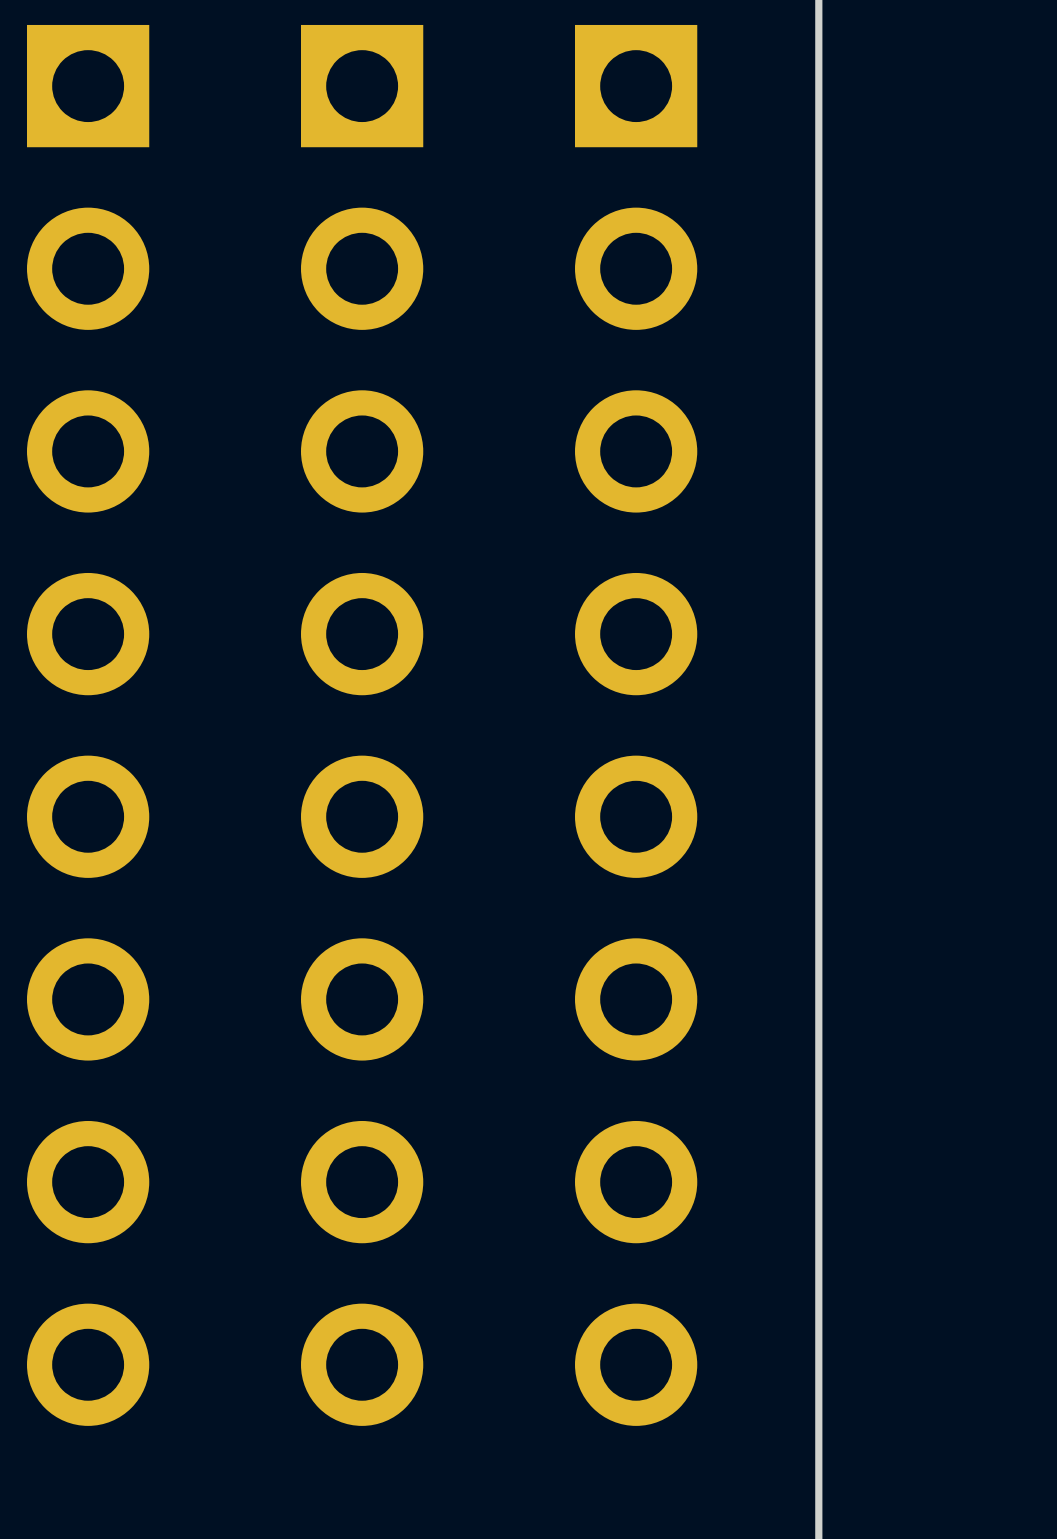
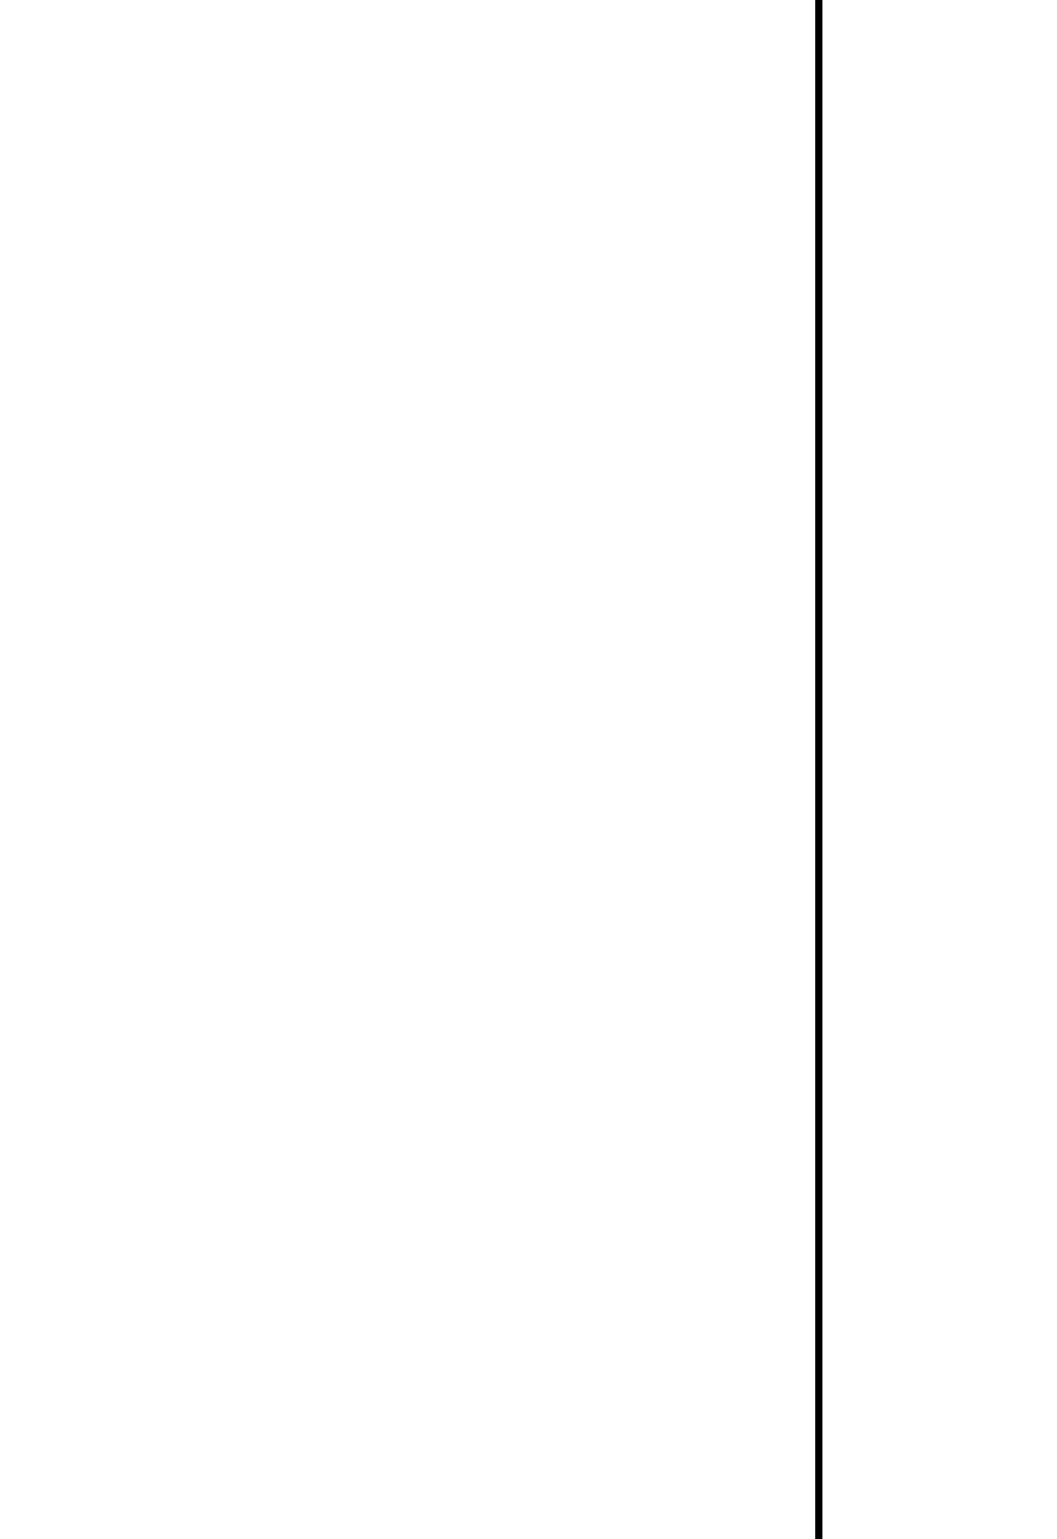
part: (88, 725) -> none
part: (362, 725) -> none
part: (636, 725) -> none

